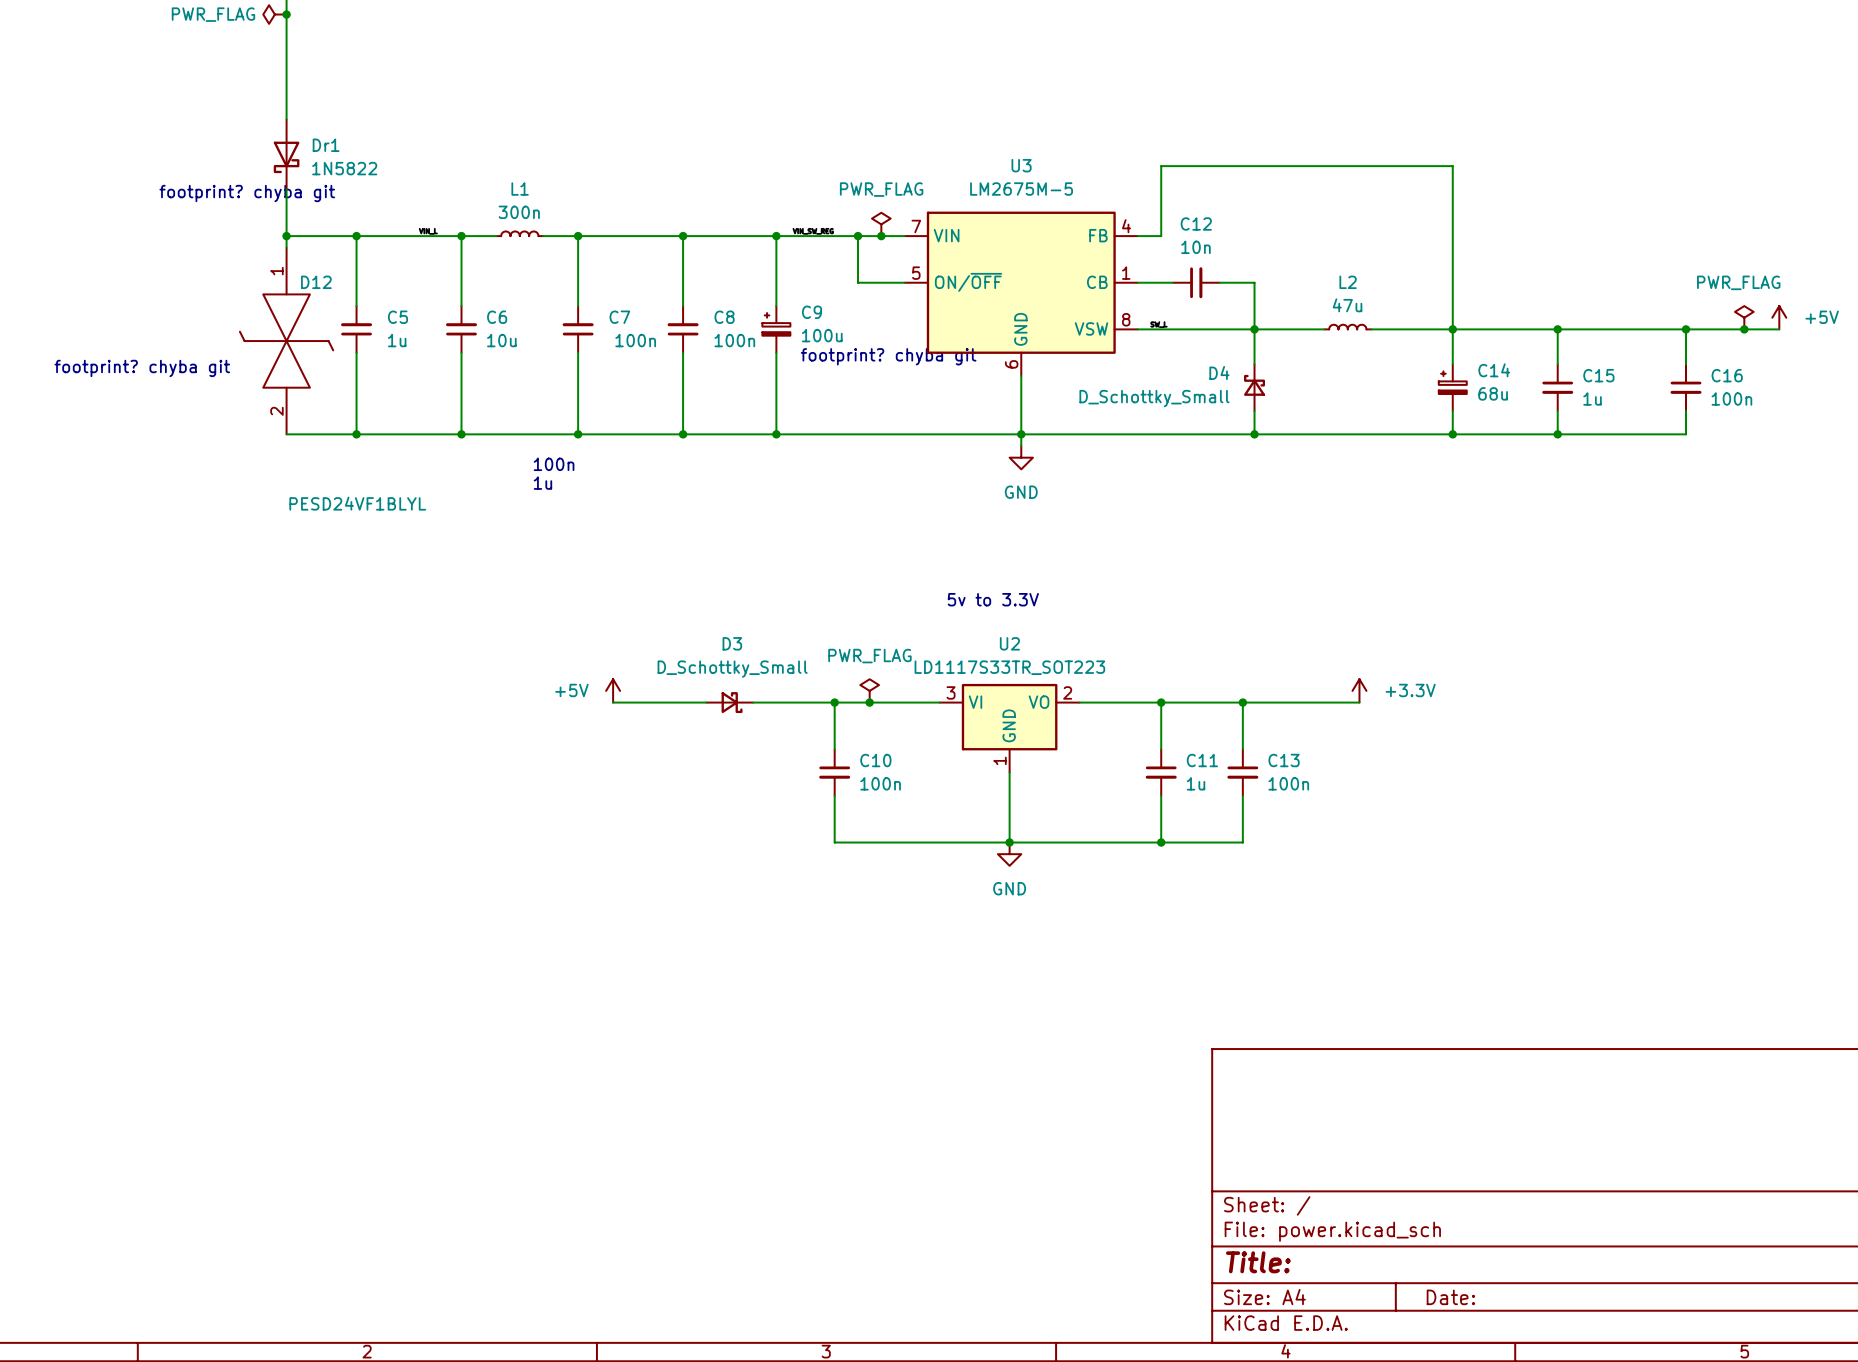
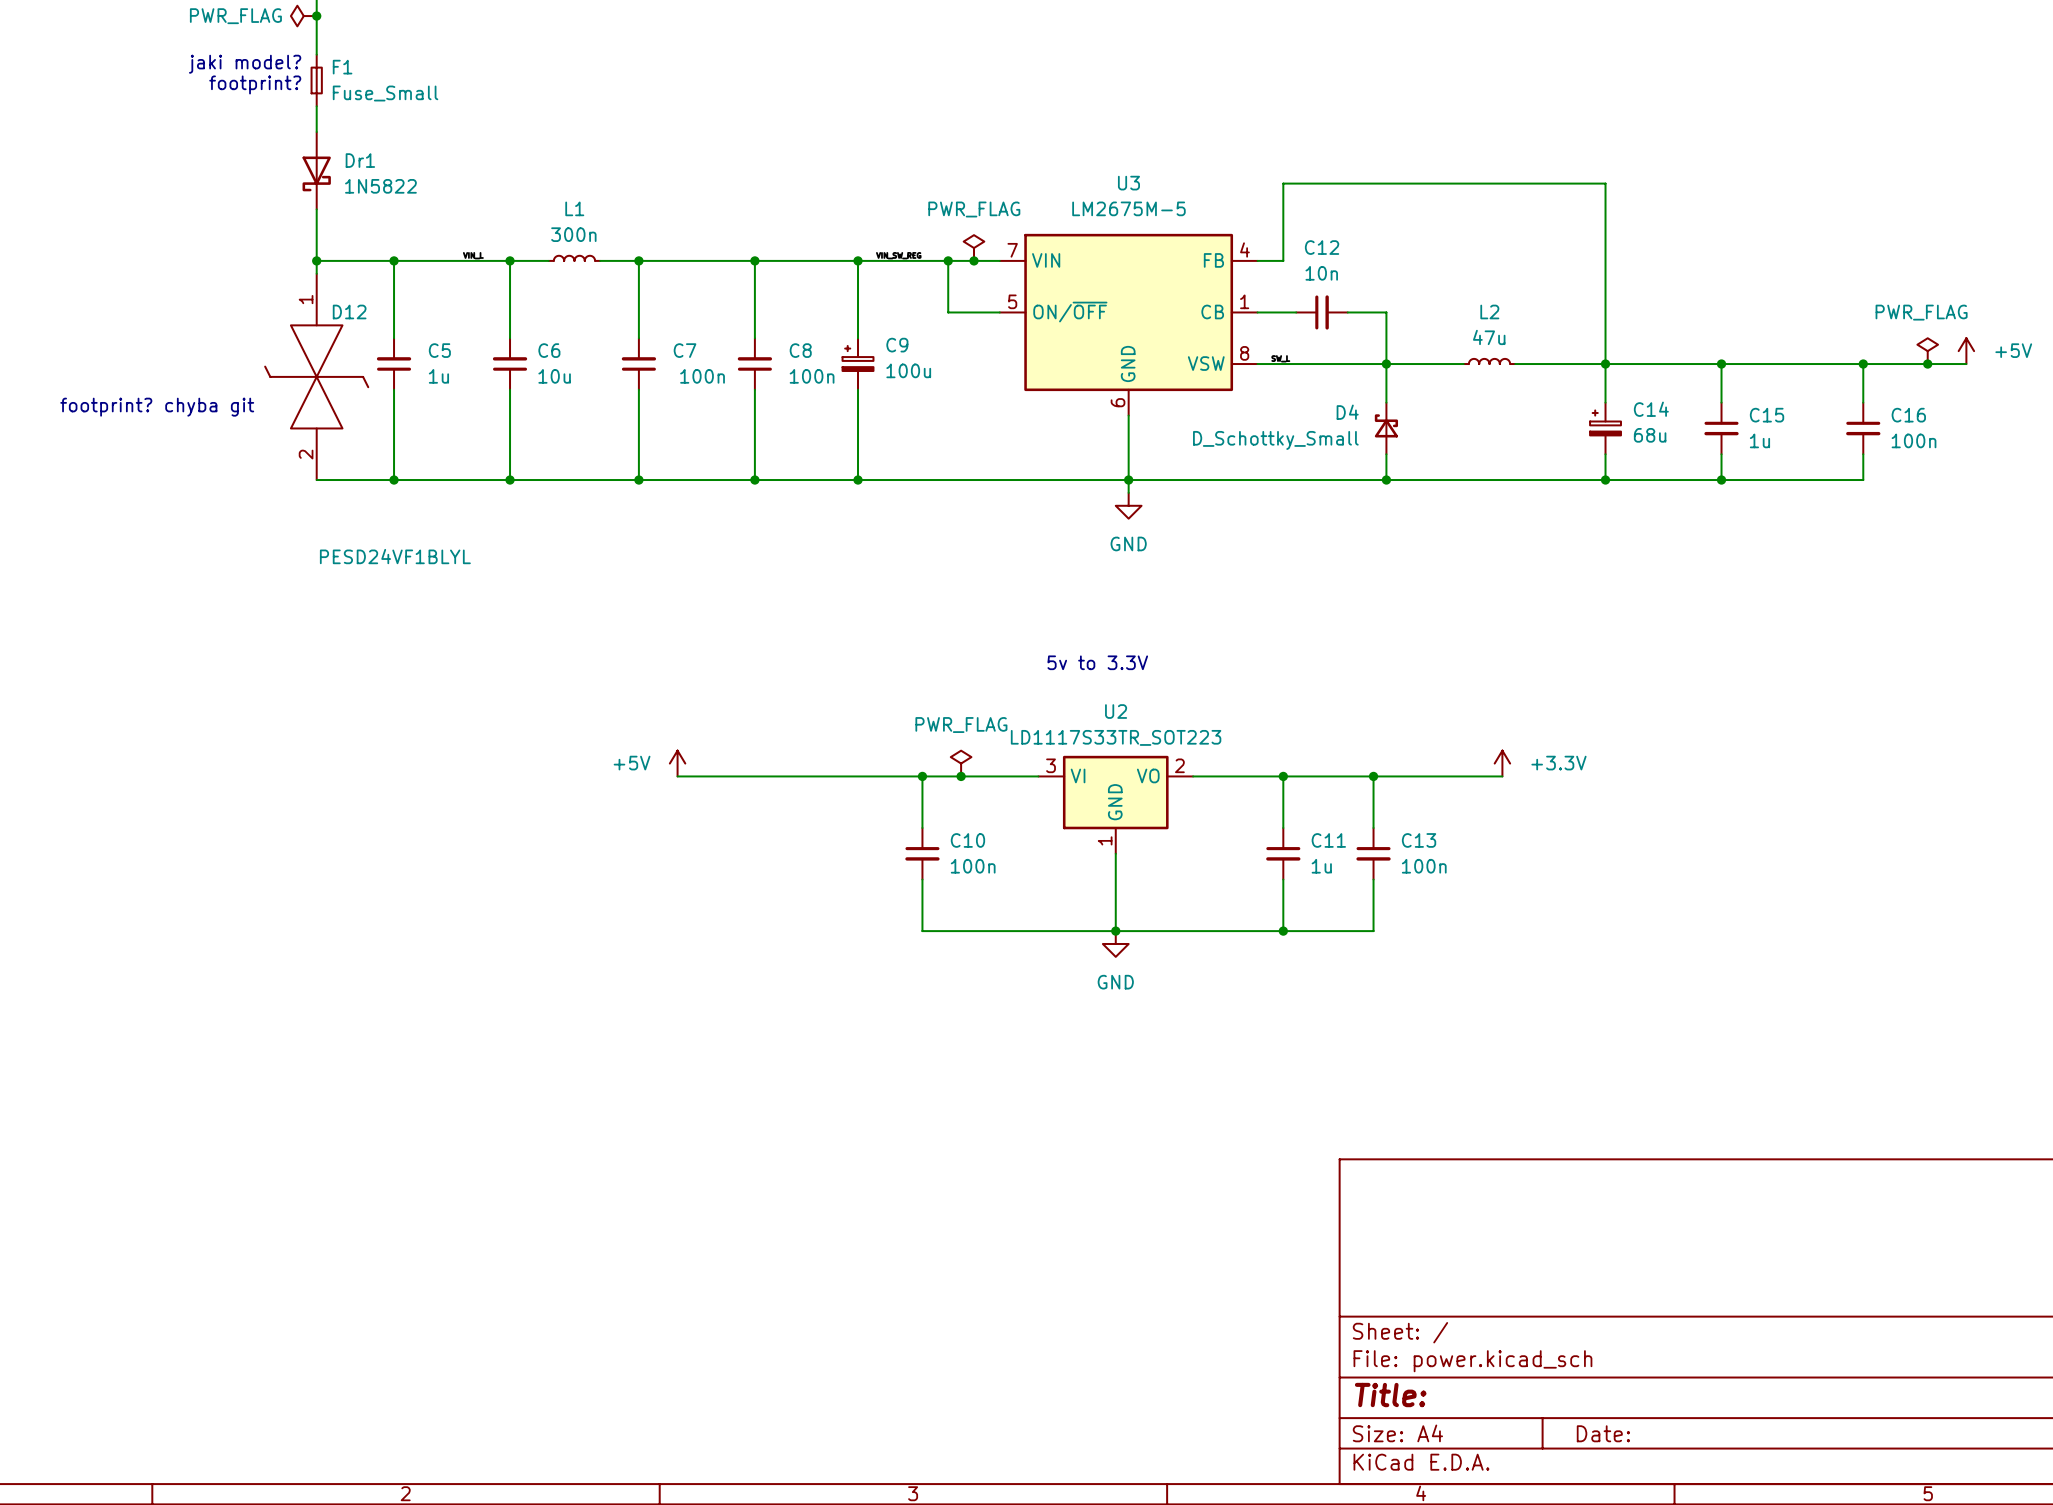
text: none -> jaki model? (245, 64)
F1: none -> Fuse_Small (316, 80)
text: none -> footprint? (255, 84)
text: footprint? chyba git (247, 193) -> none
text: footprint? chyba git (888, 356) -> none
text: 100n (554, 464) -> none
text: 1u (542, 483) -> none
D3: D_Schottky_Small (729, 702) -> none

